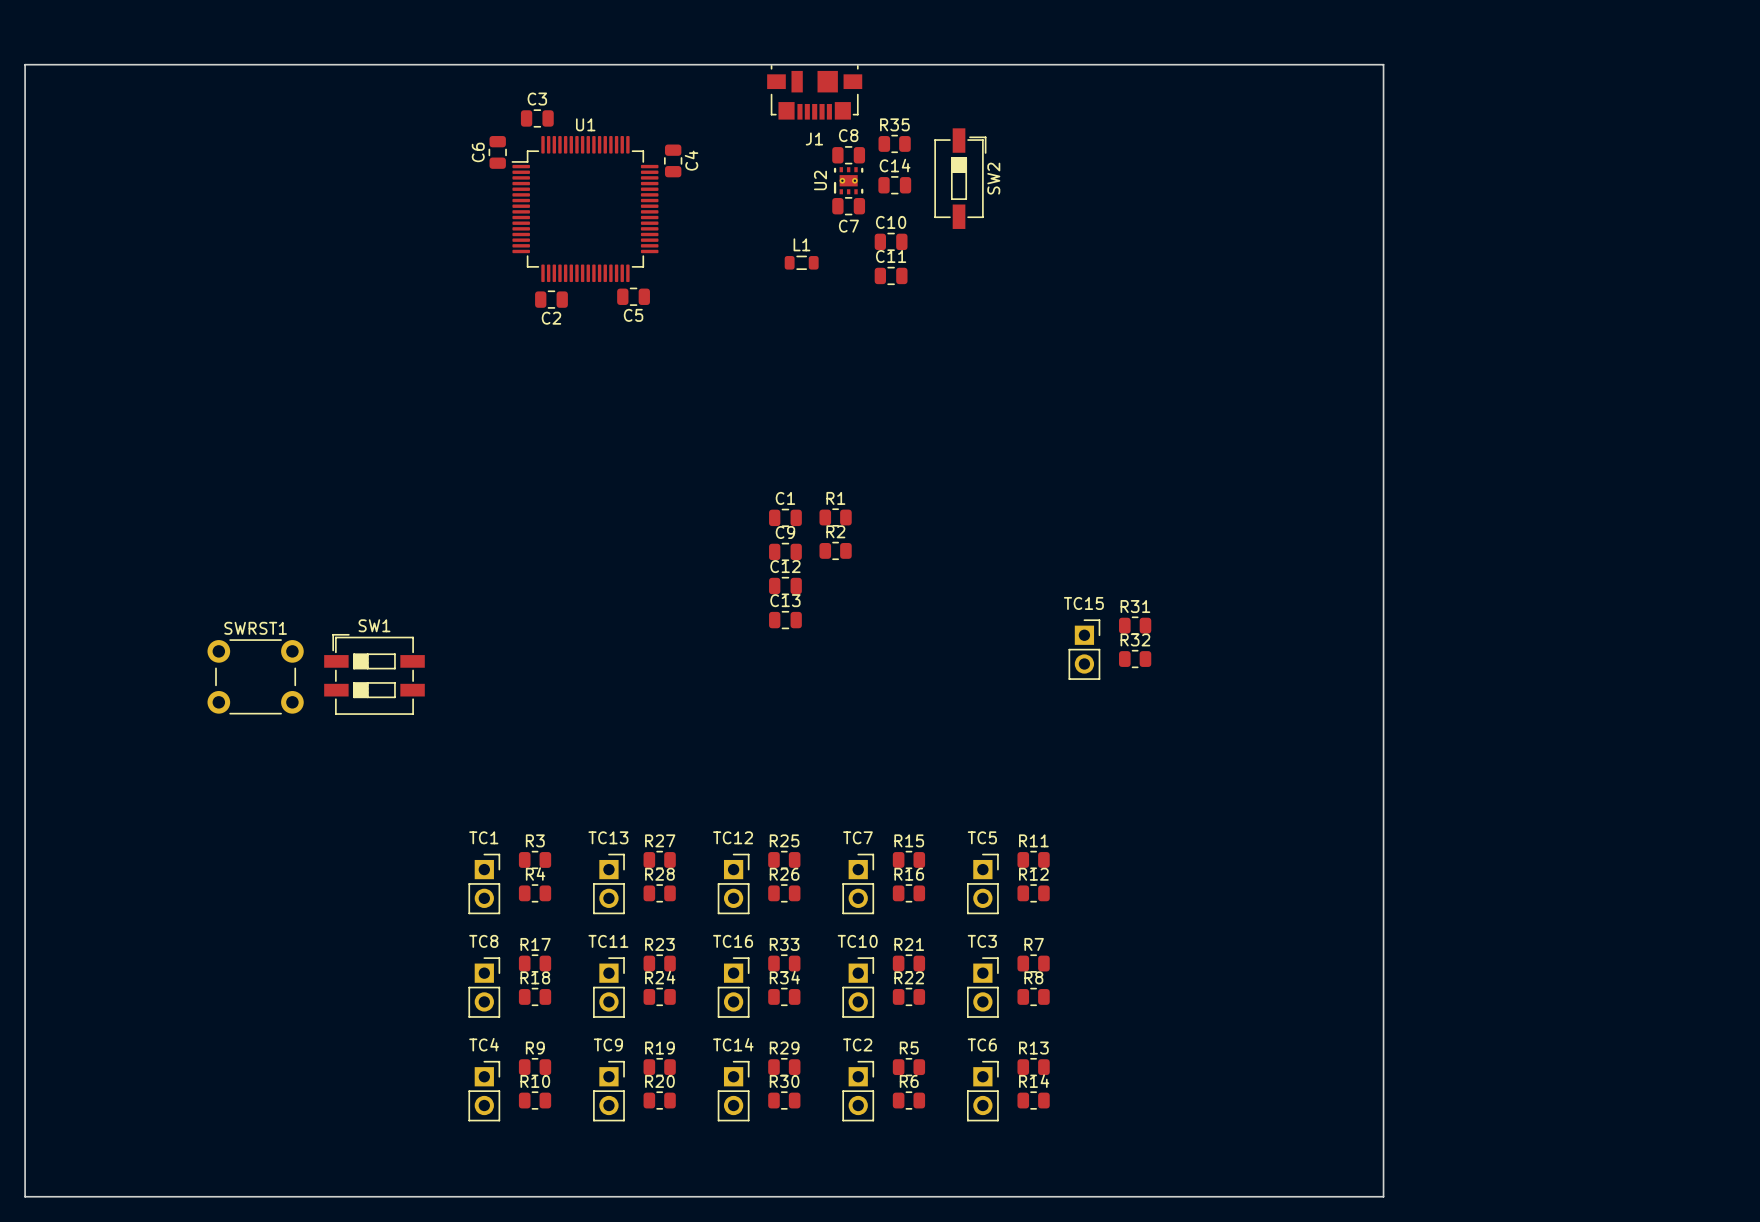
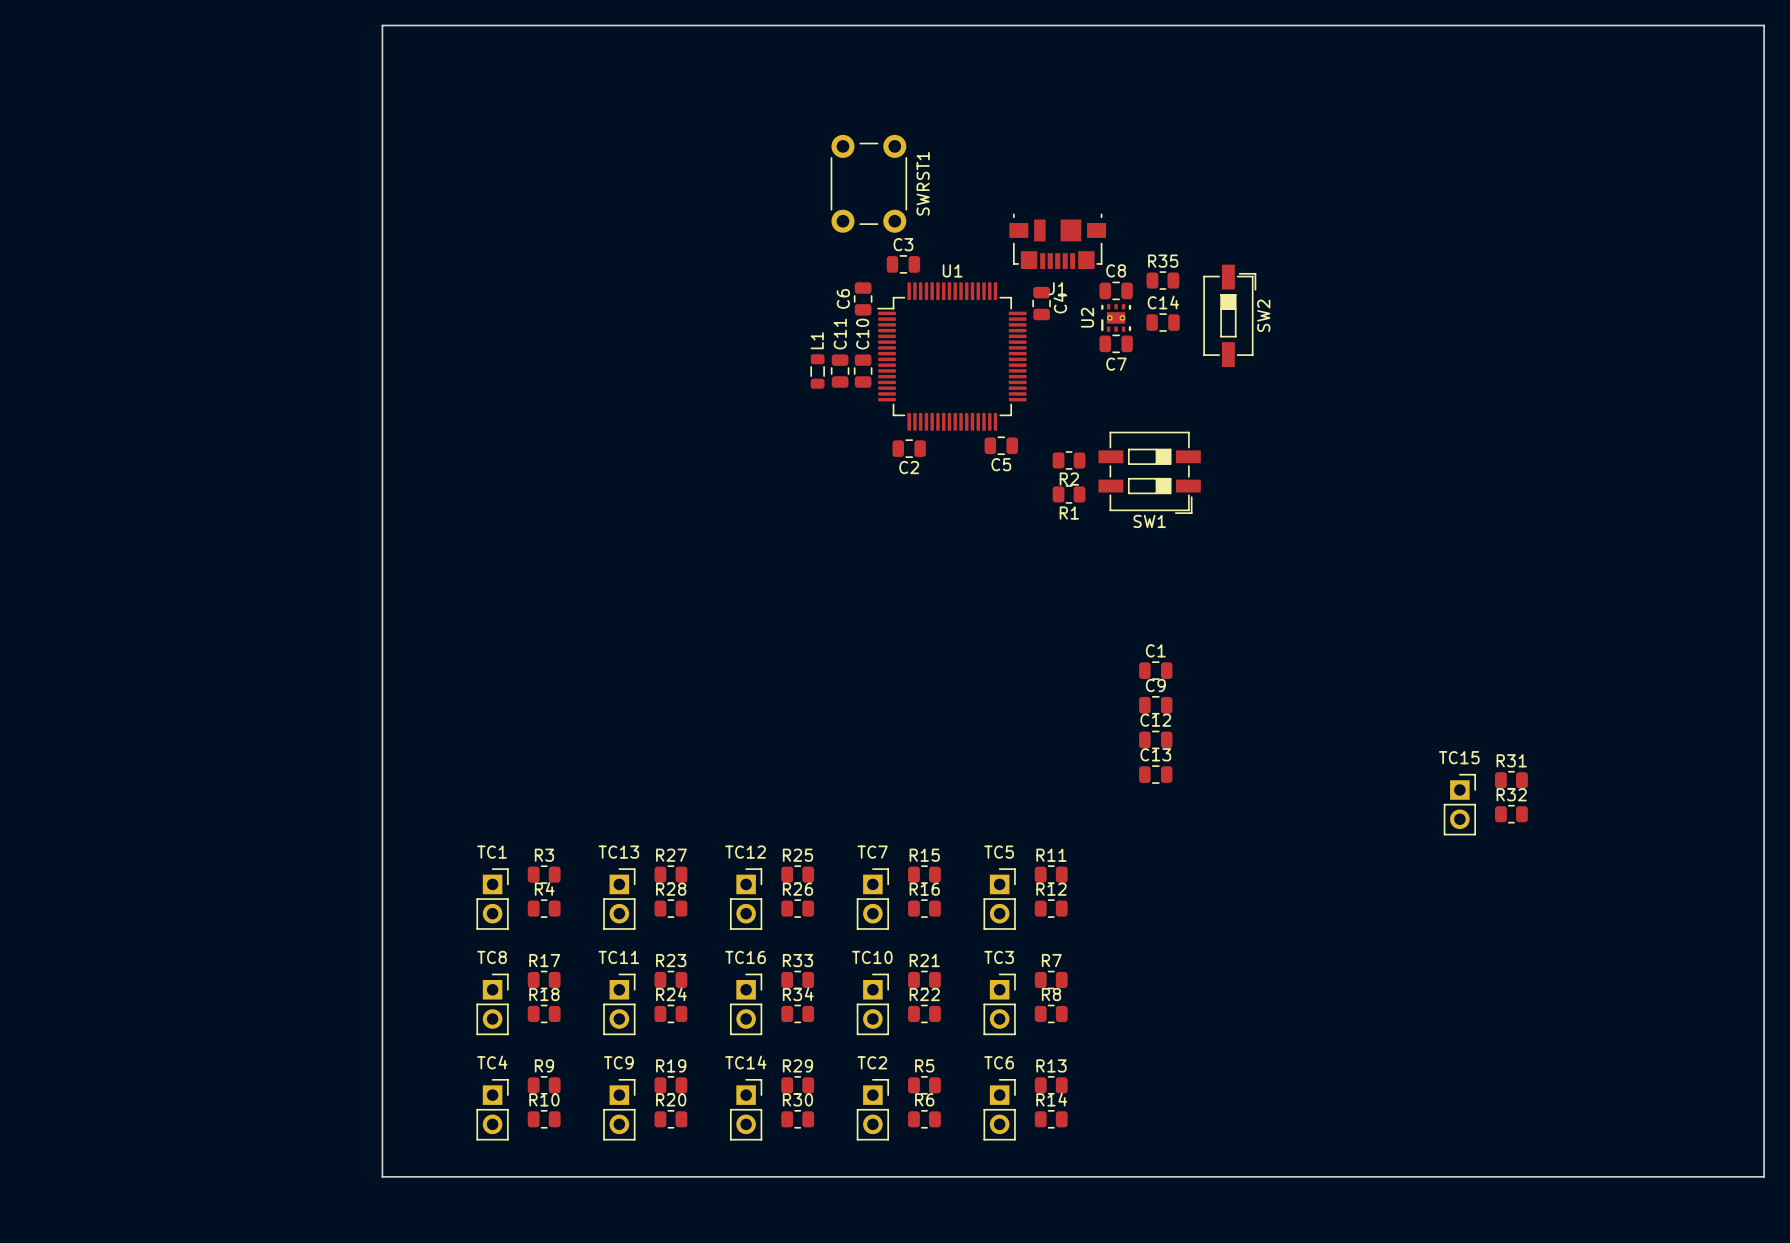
board edge: (25, 64) (1383, 64) (1383, 1196) (25, 1196) (25, 64) -> (382, 25) (1764, 25) (1764, 1176) (382, 1176) (382, 25)
J1 position: (814, 92) -> (1057, 241)
C3 position: (537, 118) -> (903, 264)
R35 position: (894, 143) -> (1162, 280)
C6 position: (497, 152) -> (863, 298)
C8 position: (848, 155) -> (1116, 290)
C4 position: (673, 160) -> (1041, 303)
SW2 position: (960, 178) -> (1229, 315)
U2 position: (848, 180) -> (1116, 317)
C14 position: (894, 185) -> (1163, 322)
C7 position: (848, 206) -> (1116, 343)
U1 position: (585, 209) -> (952, 356)
C10 rotation: 0° (891, 241) -> 90° clockwise (863, 371)
C10 position: (891, 241) -> (863, 371)
L1 rotation: 0° (801, 262) -> 90° clockwise (817, 371)
L1 position: (801, 262) -> (817, 371)
C11 rotation: 0° (891, 275) -> 90° clockwise (840, 371)
C11 position: (891, 275) -> (840, 371)
C5 position: (633, 296) -> (1001, 445)
C2 position: (551, 299) -> (909, 448)
R1 name position: R1 (835, 498) -> R1 (1069, 513)
C1 position: (785, 517) -> (1155, 670)
R1 position: (835, 517) -> (1069, 494)
R2 name position: R2 (835, 531) -> R2 (1069, 479)
R2 position: (835, 550) -> (1069, 460)
C9 position: (785, 551) -> (1155, 705)
C12 position: (785, 586) -> (1155, 739)
C13 position: (785, 620) -> (1155, 774)
R31 position: (1135, 625) -> (1511, 780)
TC15 position: (1084, 649) -> (1459, 804)
R32 position: (1135, 659) -> (1511, 814)
SW1 rotation: 0° (374, 674) -> 180° (1149, 472)
SW1 position: (374, 674) -> (1149, 472)
SWRST1 rotation: 0° (255, 676) -> 90° clockwise (868, 183)
SWRST1 position: (255, 676) -> (868, 183)

